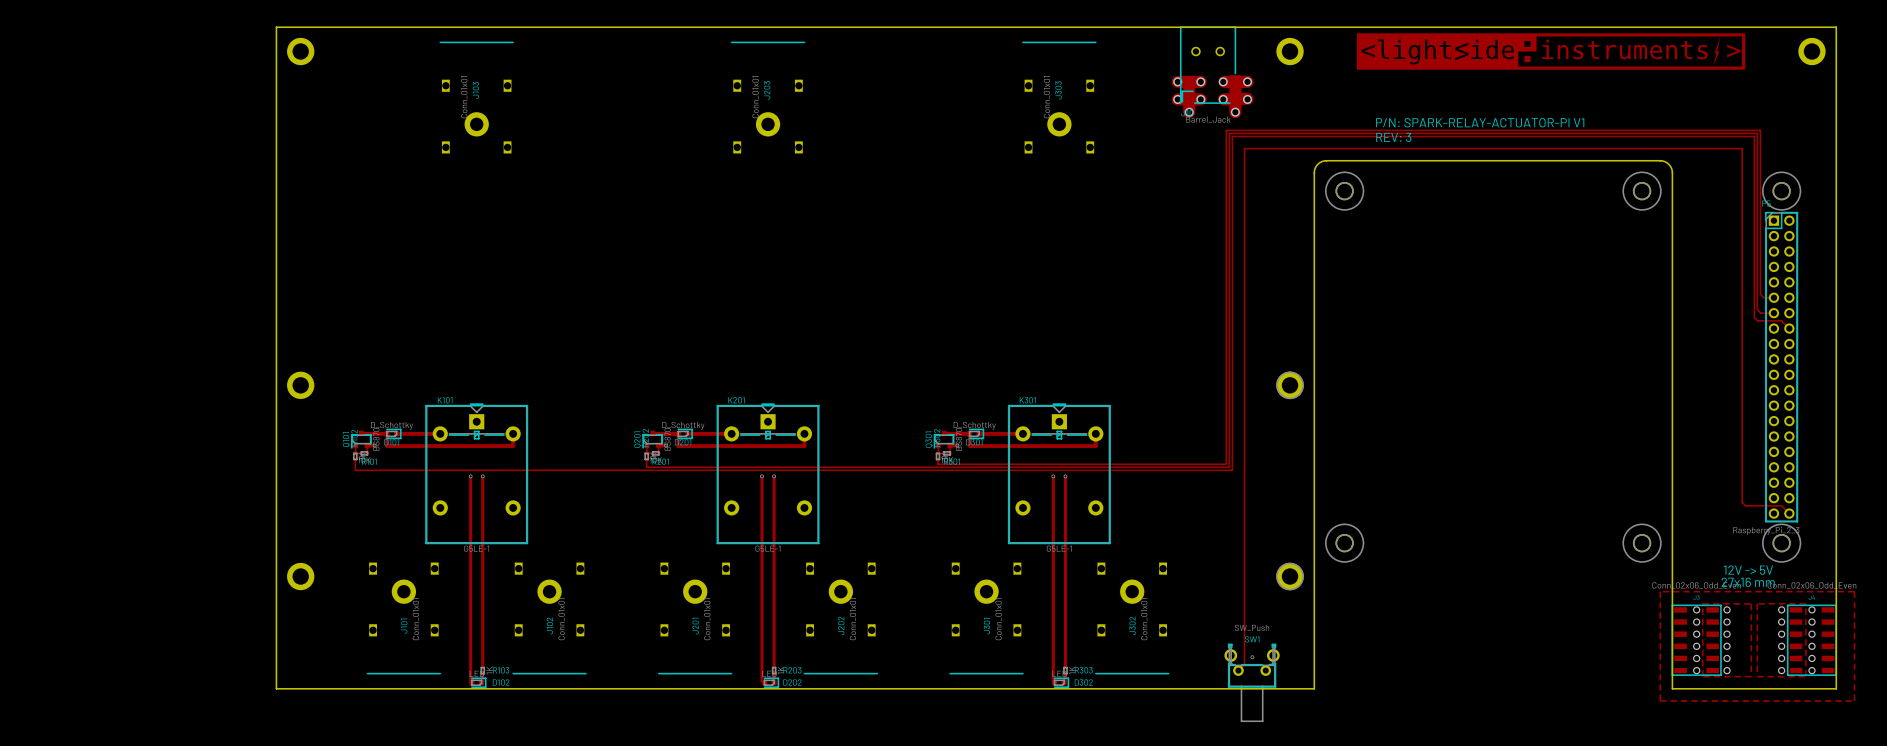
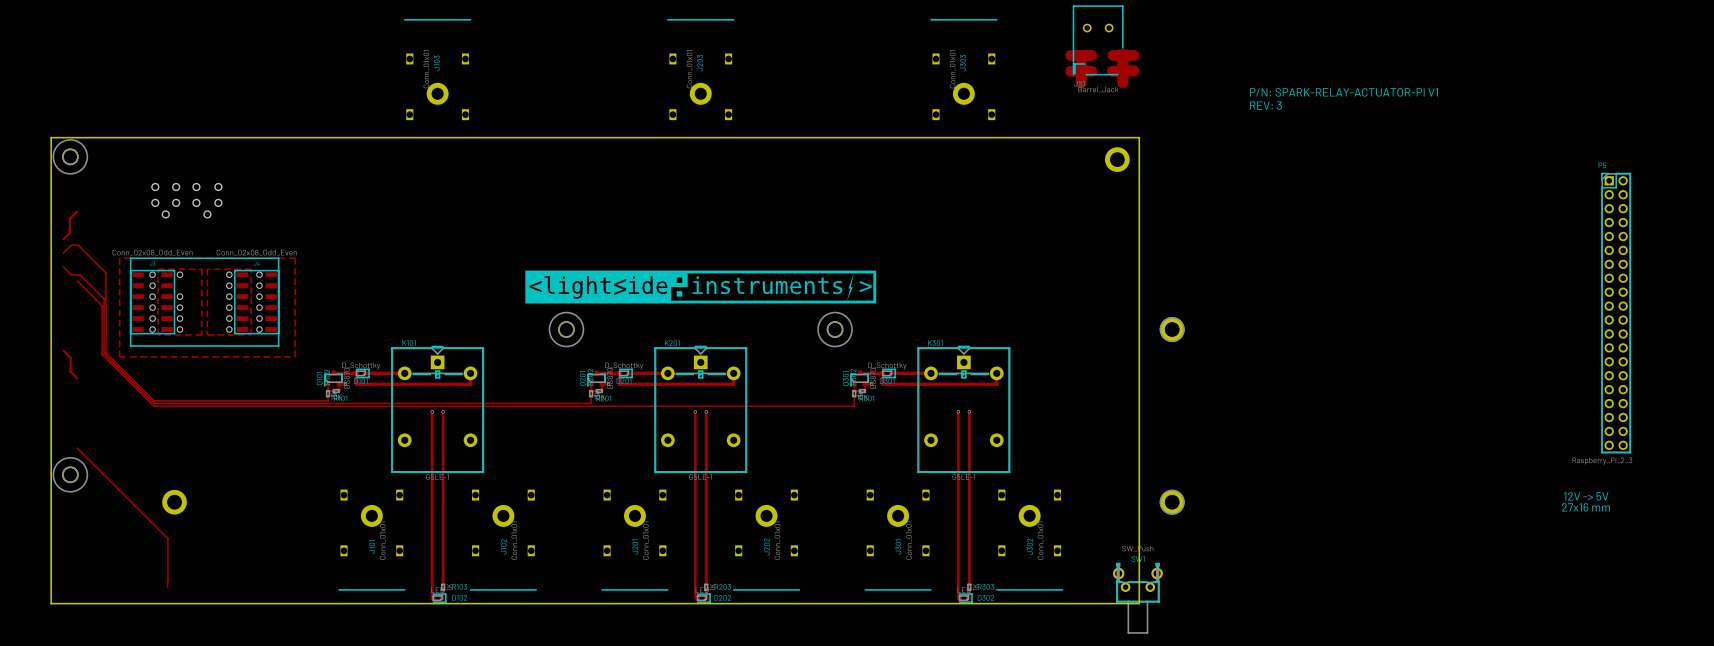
drawing: [1356, 33, 1746, 70] -> none
part: (300, 51) -> none
part: (1290, 51) -> none
part: (1812, 51) -> none
via: (1177, 81) -> none
via: (1200, 81) -> none
via: (1223, 81) -> none
via: (1247, 81) -> none
via: (1177, 99) -> none
via: (1200, 99) -> none
via: (1223, 99) -> none
via: (1247, 99) -> none
via: (1189, 112) -> none
via: (1235, 112) -> none
part: (1344, 191) -> none
part: (1642, 191) -> none
part: (1781, 191) -> none
part: none -> (70, 156)
part: none -> (1117, 159)
via: none -> (155, 187)
via: none -> (176, 187)
via: none -> (196, 187)
via: none -> (218, 187)
via: none -> (155, 202)
via: none -> (176, 202)
via: none -> (196, 202)
via: none -> (218, 202)
track: none -> (77, 211) (70, 218) (70, 232) (63, 239)
via: none -> (165, 214)
via: none -> (207, 214)
track: (1773, 297) (1763, 297) (1760, 294) (1760, 130) (1226, 130) (1226, 464) (937, 464) -> (854, 406) (854, 400)
track: none -> (63, 253) (71, 245) (78, 245) (105, 272) (105, 352) (153, 400) (328, 400)
zone outline: none -> (119, 258) (295, 258) (295, 356) (119, 356) (119, 258)
line: none -> (130, 258) (130, 345) (278, 345) (278, 258) (130, 258)
track: (1773, 313) (1760, 313) (1757, 309) (1757, 133) (1229, 133) (1229, 467) (646, 467) -> (63, 267) (71, 274) (80, 274) (104, 298) (104, 353) (153, 403) (591, 403)
zone outline: none -> (158, 269) (201, 269) (201, 335) (158, 335) (158, 269)
zone outline: none -> (207, 269) (251, 269) (251, 335) (207, 335) (207, 269)
drawing: none -> [525, 270, 877, 304]
via: none -> (152, 274)
via: none -> (179, 274)
via: none -> (229, 274)
via: none -> (259, 274)
track: (1789, 328) (1781, 320) (1757, 320) (1754, 317) (1754, 136) (1232, 136) (1232, 470) (937, 470) -> none
via: none -> (152, 285)
via: none -> (229, 285)
via: none -> (259, 285)
via: none -> (152, 296)
via: none -> (179, 296)
via: none -> (229, 296)
via: none -> (259, 296)
via: none -> (152, 307)
via: none -> (179, 307)
via: none -> (229, 307)
via: none -> (259, 307)
via: none -> (152, 318)
via: none -> (179, 318)
via: none -> (229, 318)
via: none -> (259, 318)
via: none -> (152, 329)
via: none -> (179, 329)
via: none -> (229, 329)
via: none -> (259, 329)
part: (300, 385) -> none
part: none -> (566, 329)
part: none -> (835, 329)
track: none -> (63, 350) (70, 357) (70, 371) (77, 378)
track: (355, 464) (355, 470) -> (77, 281) (102, 305) (102, 354) (153, 406) (328, 406)
track: (1789, 513) (1781, 505) (1745, 505) (1742, 502) (1742, 148) (1244, 148) (1244, 664) (1238, 670) -> none
track: none -> (77, 448) (167, 538) (167, 587)
part: (1344, 543) -> none
part: (1642, 543) -> none
part: (1781, 543) -> none
part: none -> (70, 474)
part: none -> (174, 502)
part: (300, 576) -> none
zone outline: (1660, 591) (1854, 591) (1854, 700) (1660, 700) (1660, 591) -> none
zone outline: (1702, 603) (1751, 603) (1751, 676) (1702, 676) (1702, 603) -> none
zone outline: (1757, 603) (1805, 603) (1805, 676) (1757, 676) (1757, 603) -> none
via: (1696, 609) -> none
via: (1727, 609) -> none
via: (1781, 609) -> none
via: (1812, 609) -> none
via: (1696, 622) -> none
via: (1727, 622) -> none
via: (1781, 622) -> none
via: (1812, 622) -> none
via: (1696, 634) -> none
via: (1727, 634) -> none
via: (1781, 634) -> none
via: (1812, 634) -> none
part position: (1696, 640) -> (152, 302)
part position: (1812, 640) -> (256, 302)
via: (1696, 646) -> none
via: (1727, 646) -> none
via: (1781, 646) -> none
via: (1812, 646) -> none
via: (1252, 657) -> none
via: (1696, 658) -> none
via: (1727, 658) -> none
via: (1781, 658) -> none
via: (1812, 658) -> none
via: (1696, 670) -> none
via: (1727, 670) -> none
via: (1781, 670) -> none
via: (1812, 670) -> none
board edge: (276, 688) (276, 27) (1836, 27) (1836, 688) (1672, 688) (1672, 172) (1668, 164) (1660, 160) (1326, 160) (1316, 165) (1314, 172) (1314, 688) (1253, 688) -> (256, 603) (51, 603) (51, 137) (1139, 137) (1139, 603)

